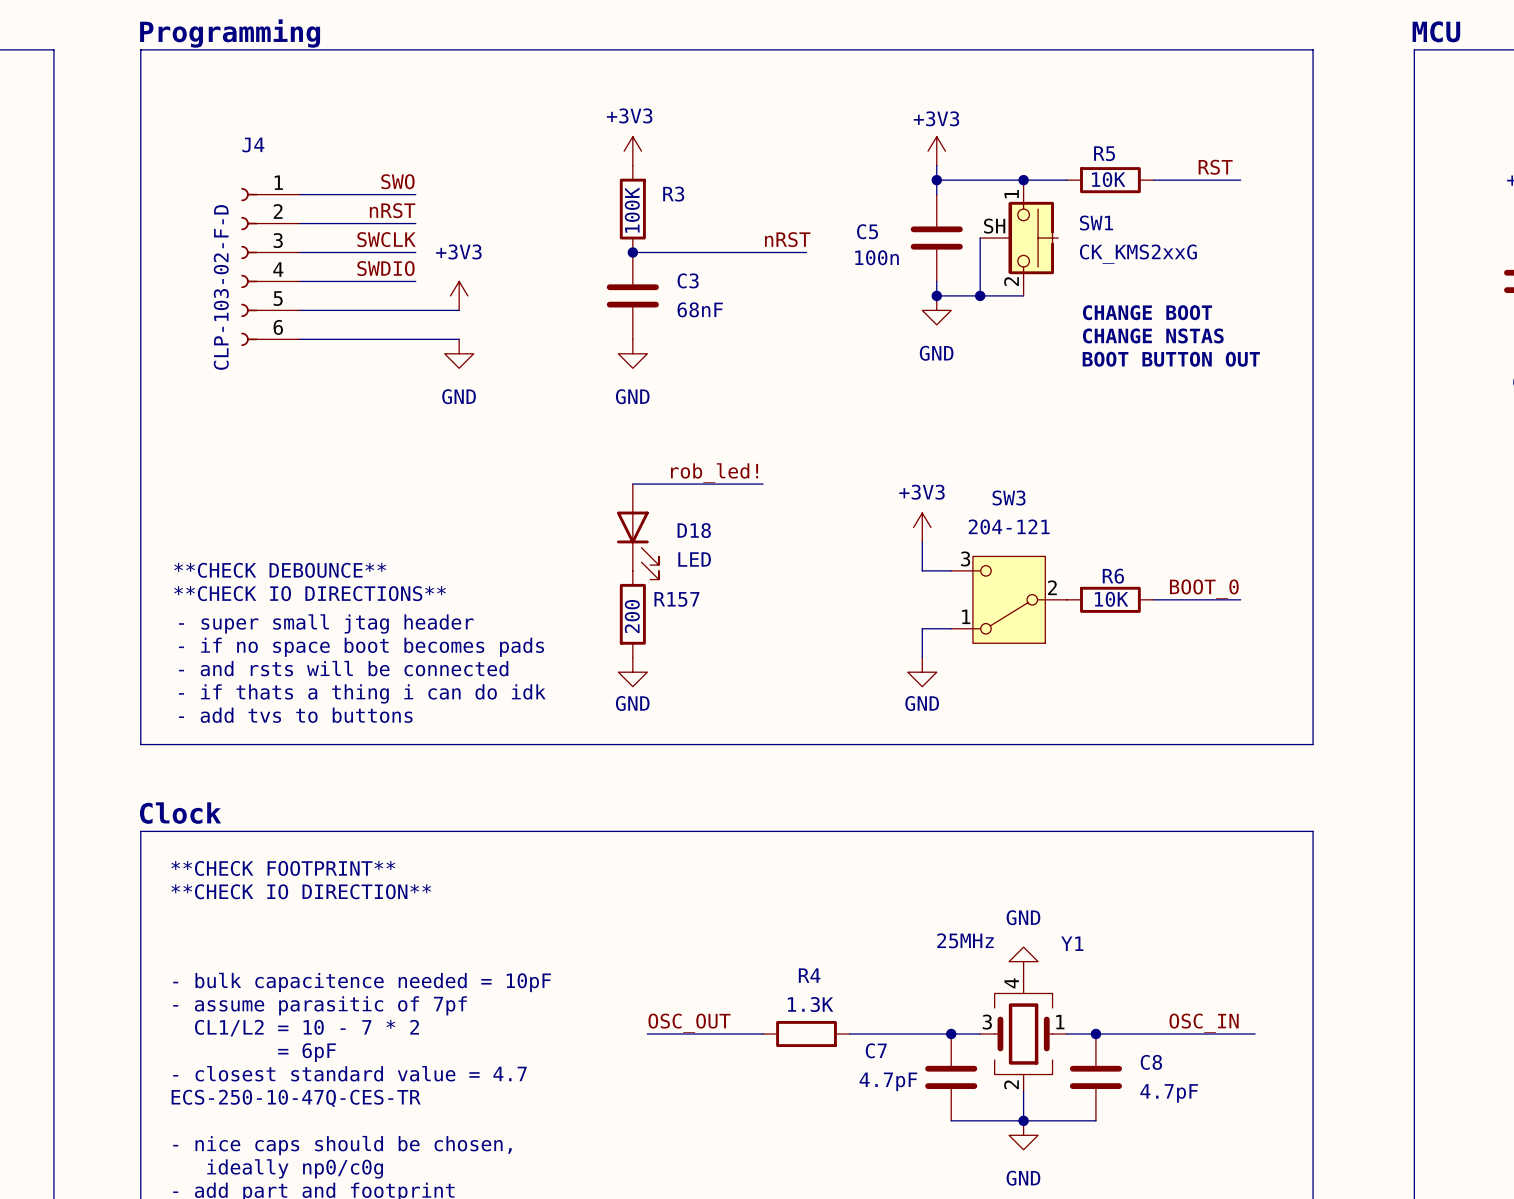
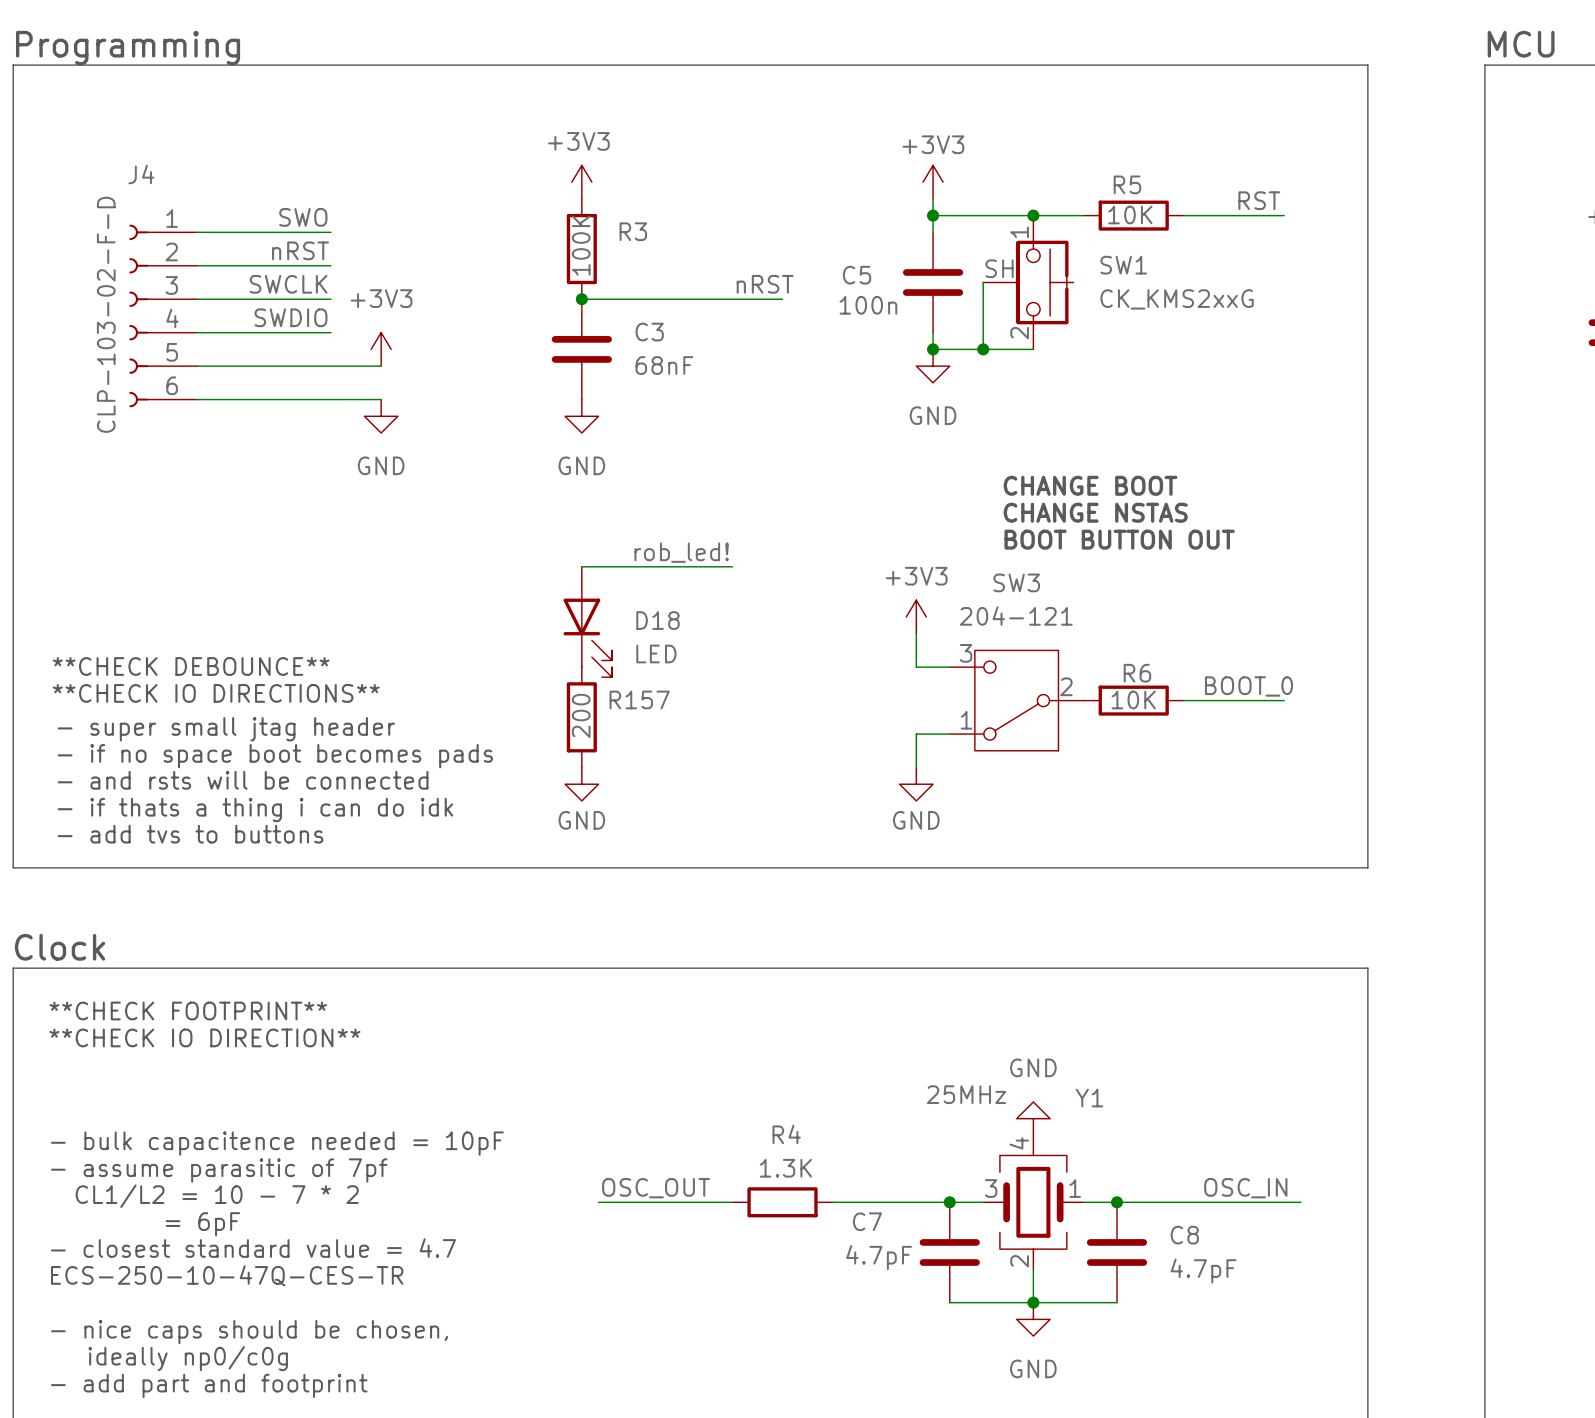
text position: CHANGE BOOT (1147, 312) -> CHANGE BOOT (1090, 485)
text position: CHANGE NSTAS (1153, 335) -> CHANGE NSTAS (1095, 512)
text position: BOOT BUTTON OUT (1171, 359) -> BOOT BUTTON OUT (1119, 539)

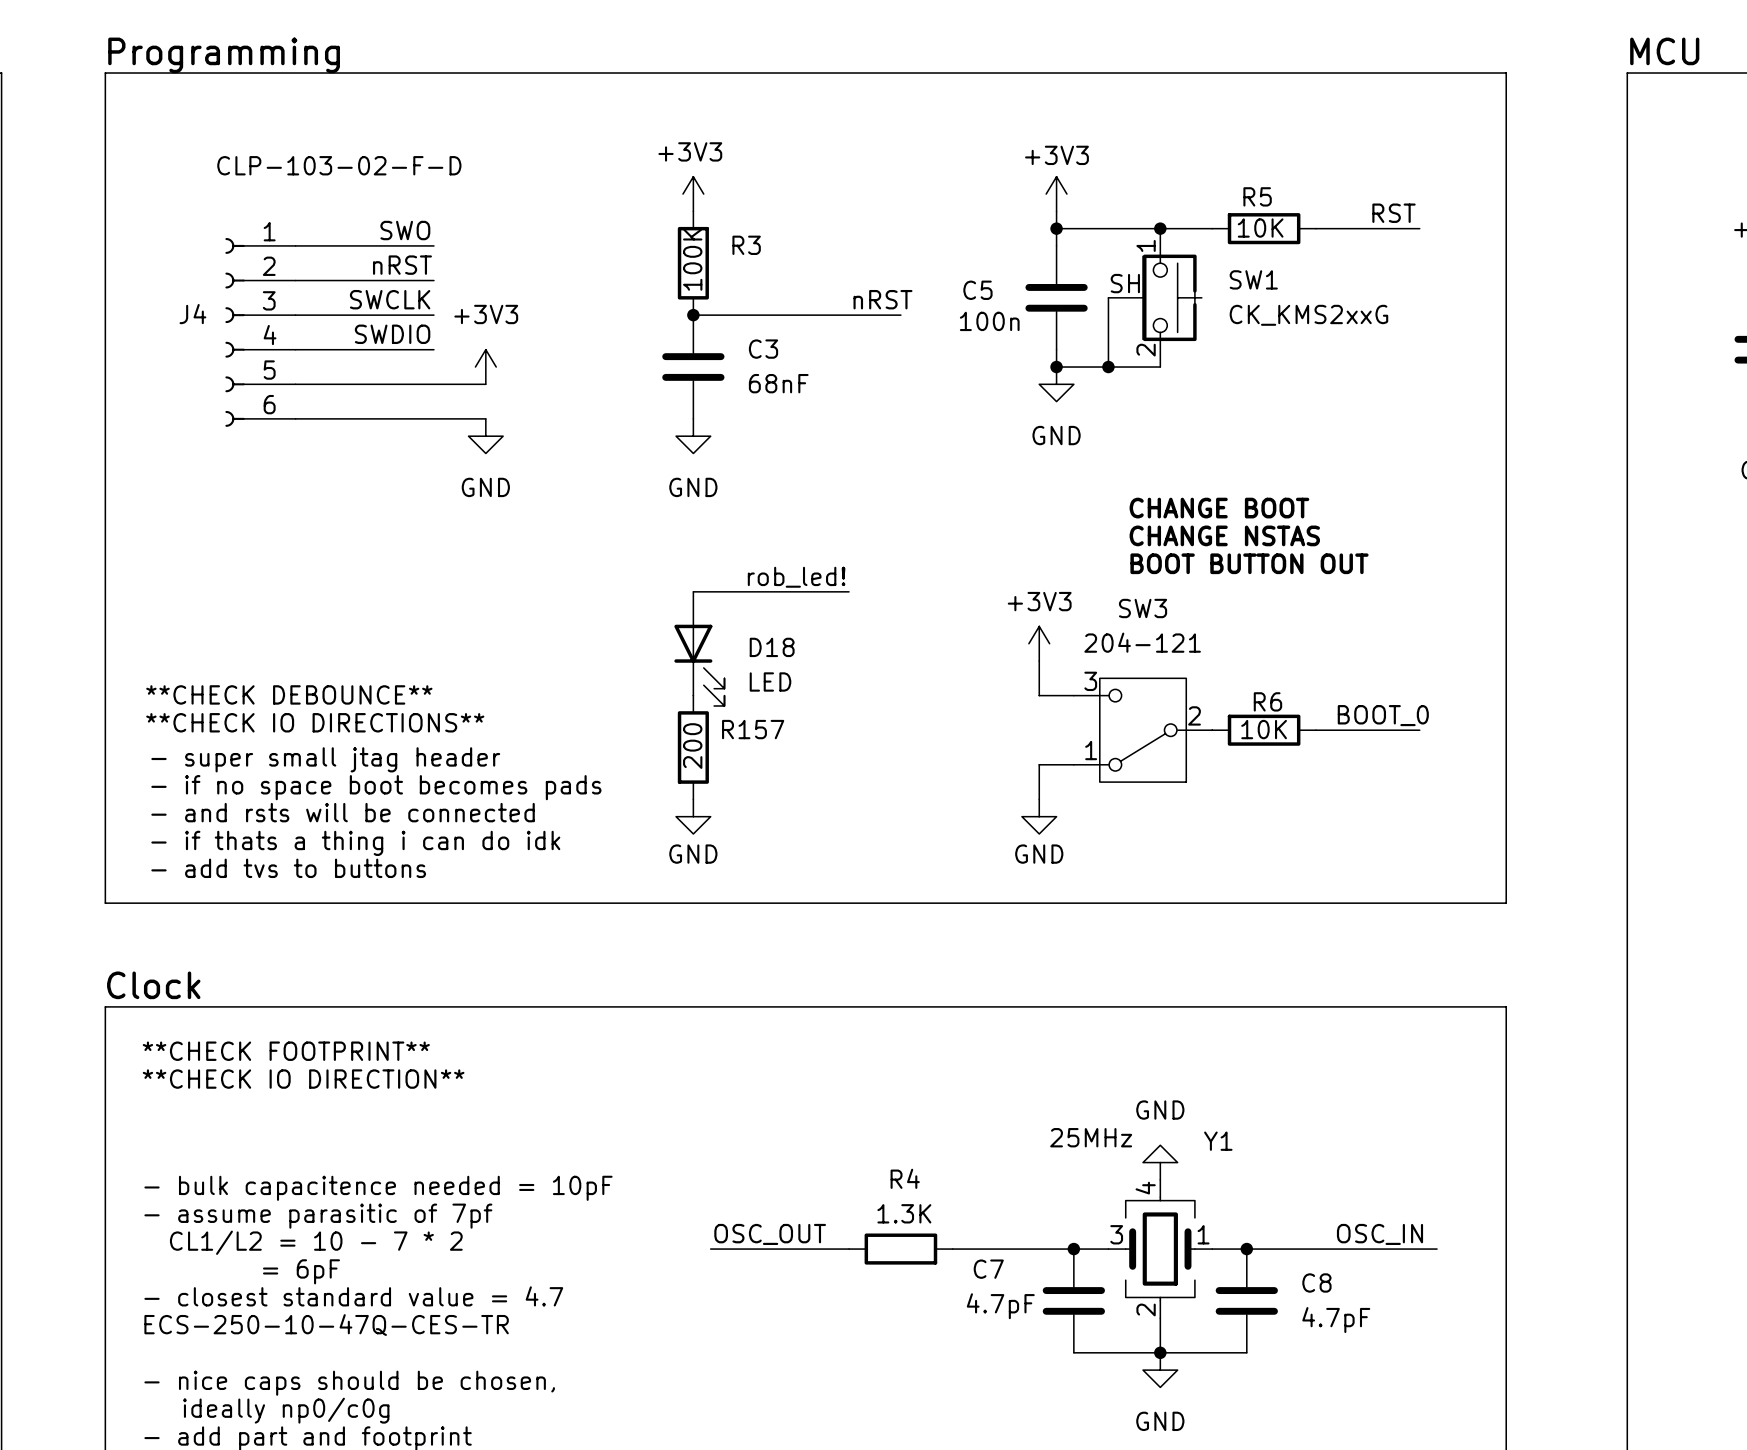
J4 name position: J4 (141, 174) -> J4 (192, 314)
J4 value rotation: 0° (106, 314) -> 90° clockwise (339, 165)

